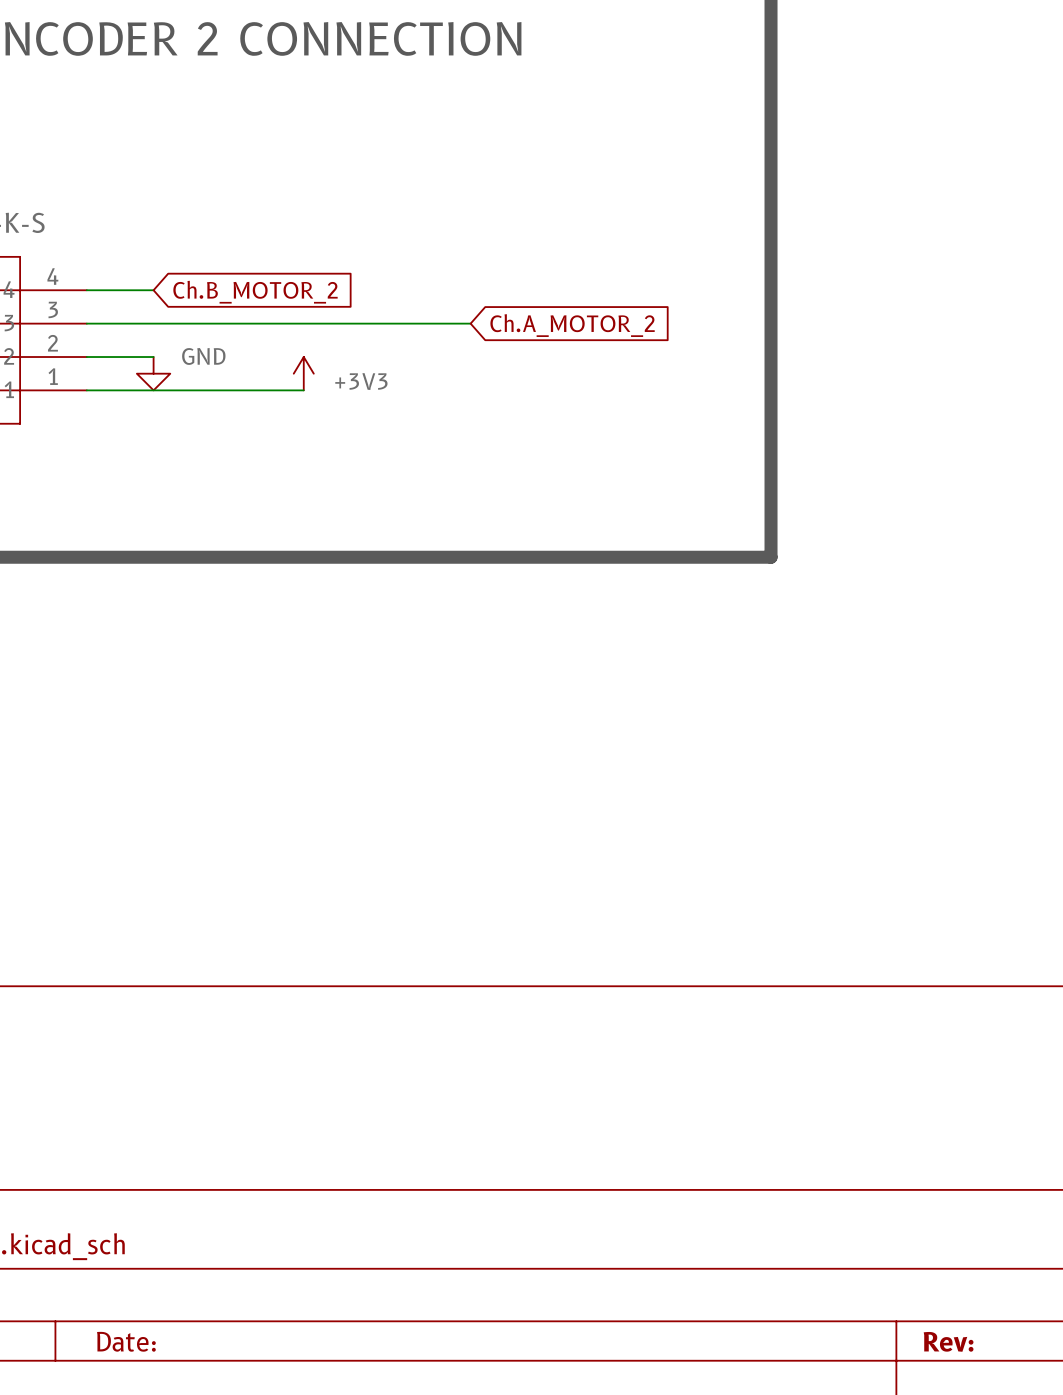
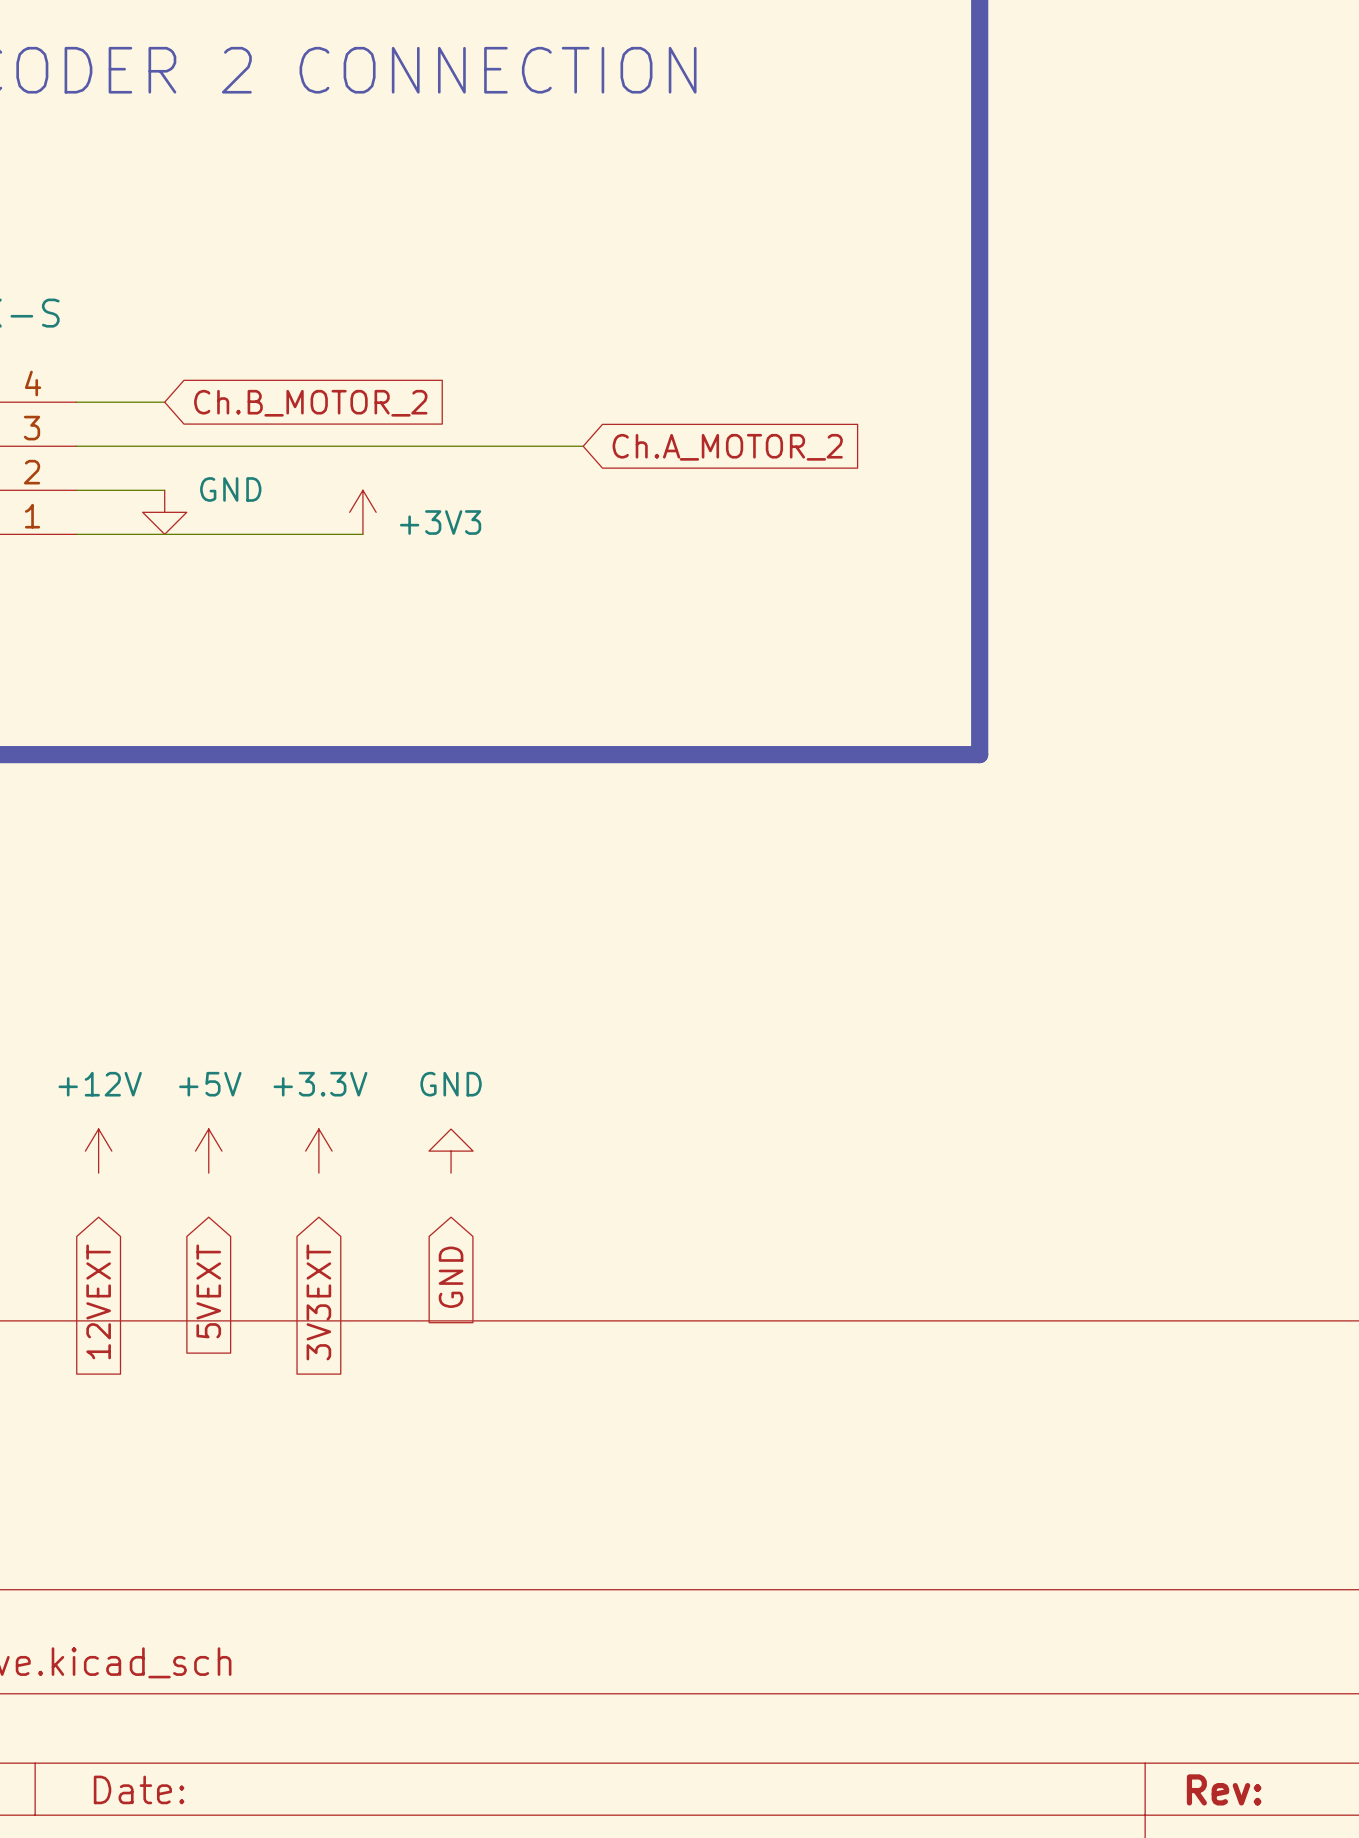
power symbol: none -> +12V (98, 1151)
power symbol: none -> +5V (208, 1151)
power symbol: none -> +3.3V (318, 1151)
power symbol: none -> GND (451, 1151)
global label: none -> GND (451, 1277)
global label: none -> 5VEXT (208, 1291)
global label: none -> 12VEXT (98, 1301)
global label: none -> 3V3EXT (318, 1302)

